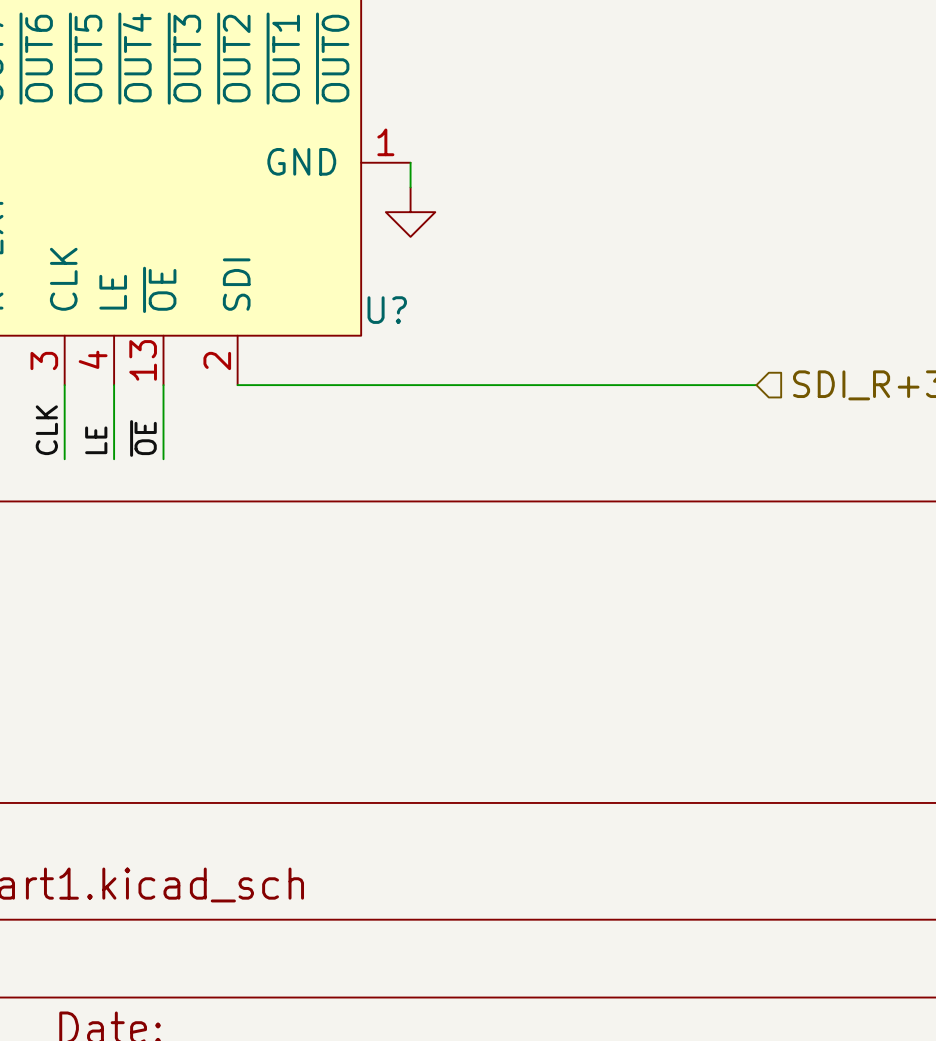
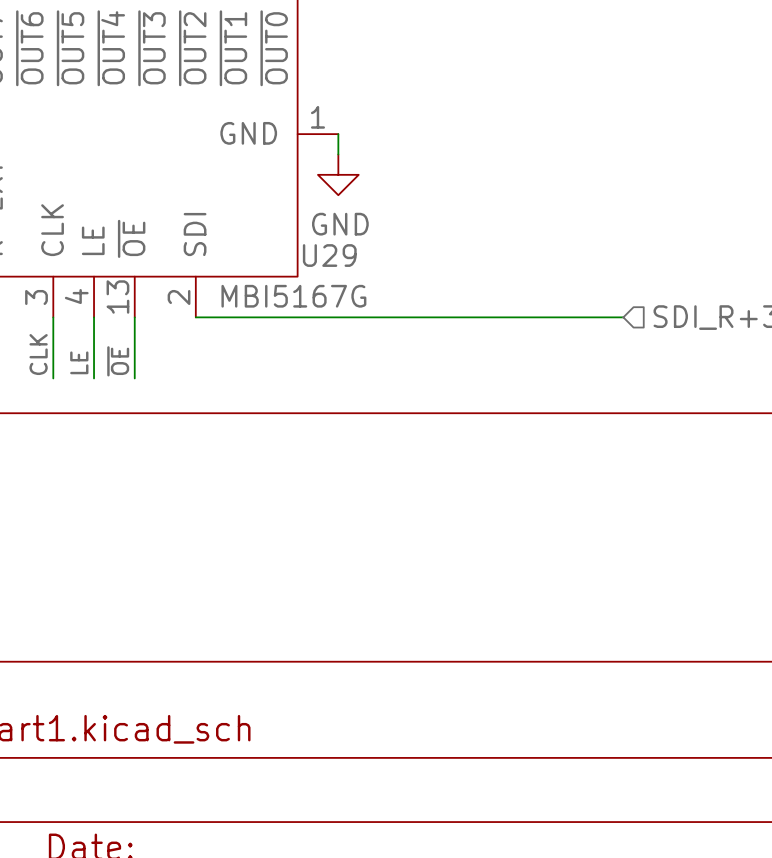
power symbol text: none -> GND (340, 224)
U? name: U? (387, 310) -> U29 (329, 255)
U? value: none -> MBI5167G (293, 296)

